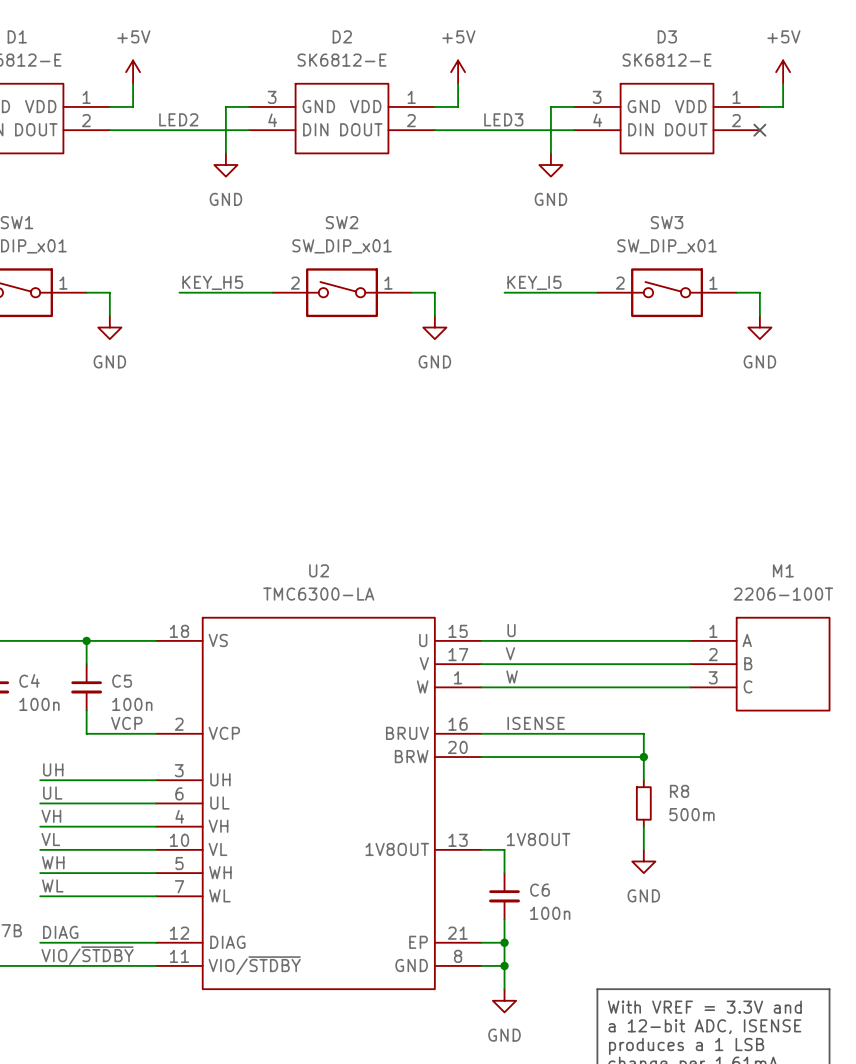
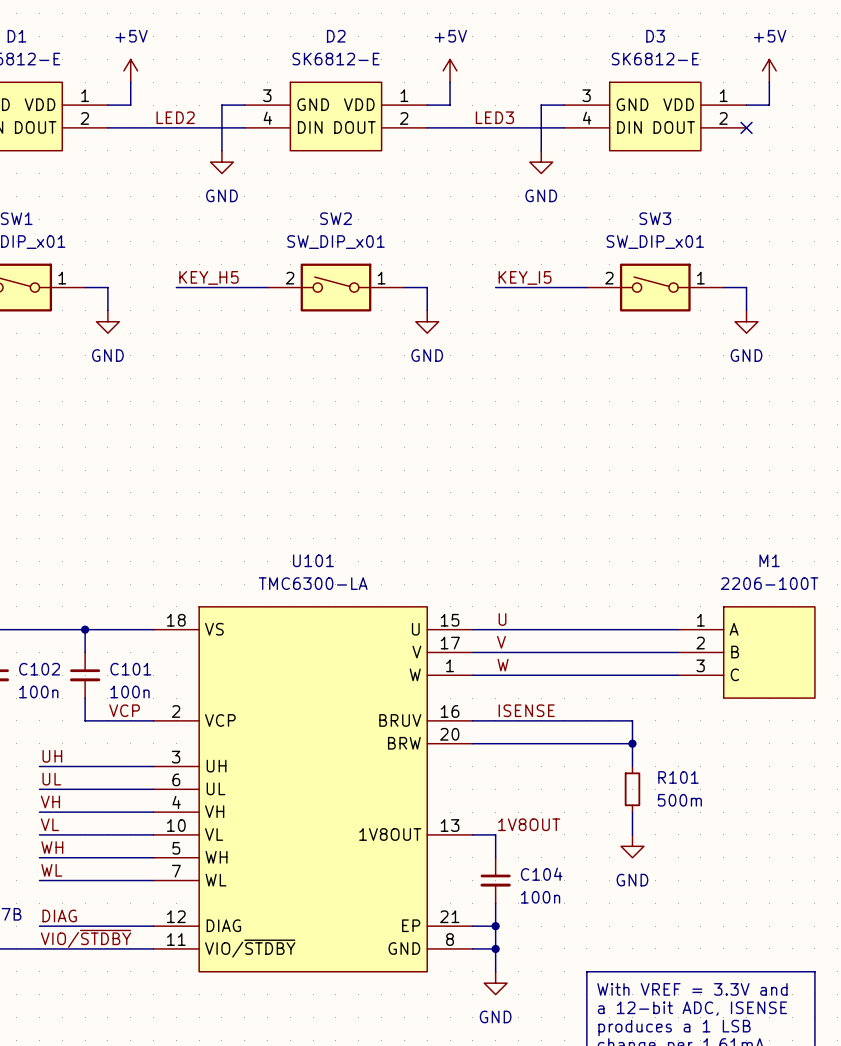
U2 name: U2 (319, 570) -> U101 (313, 560)
C4 name: C4 (29, 680) -> C102 (39, 669)
C5 name: C5 (122, 681) -> C101 (130, 669)
R8 name: R8 (679, 791) -> R101 (678, 777)
C6 name: C6 (539, 890) -> C104 (541, 874)

